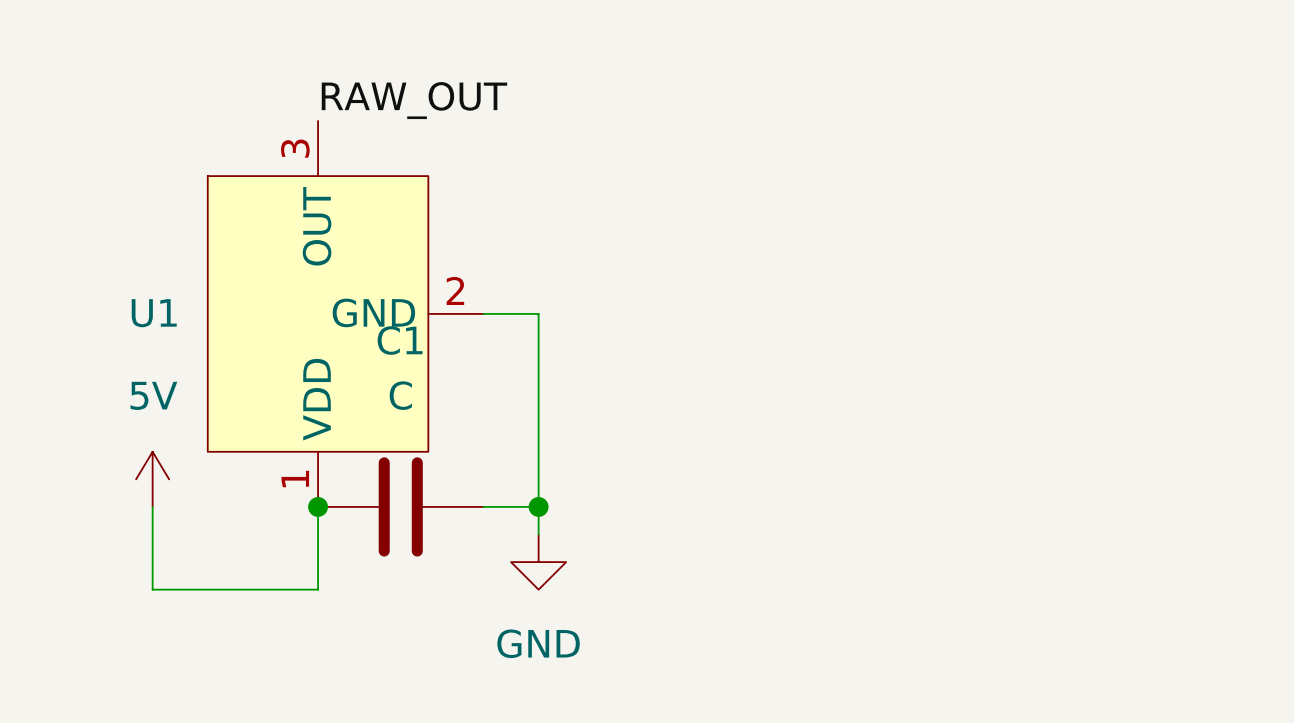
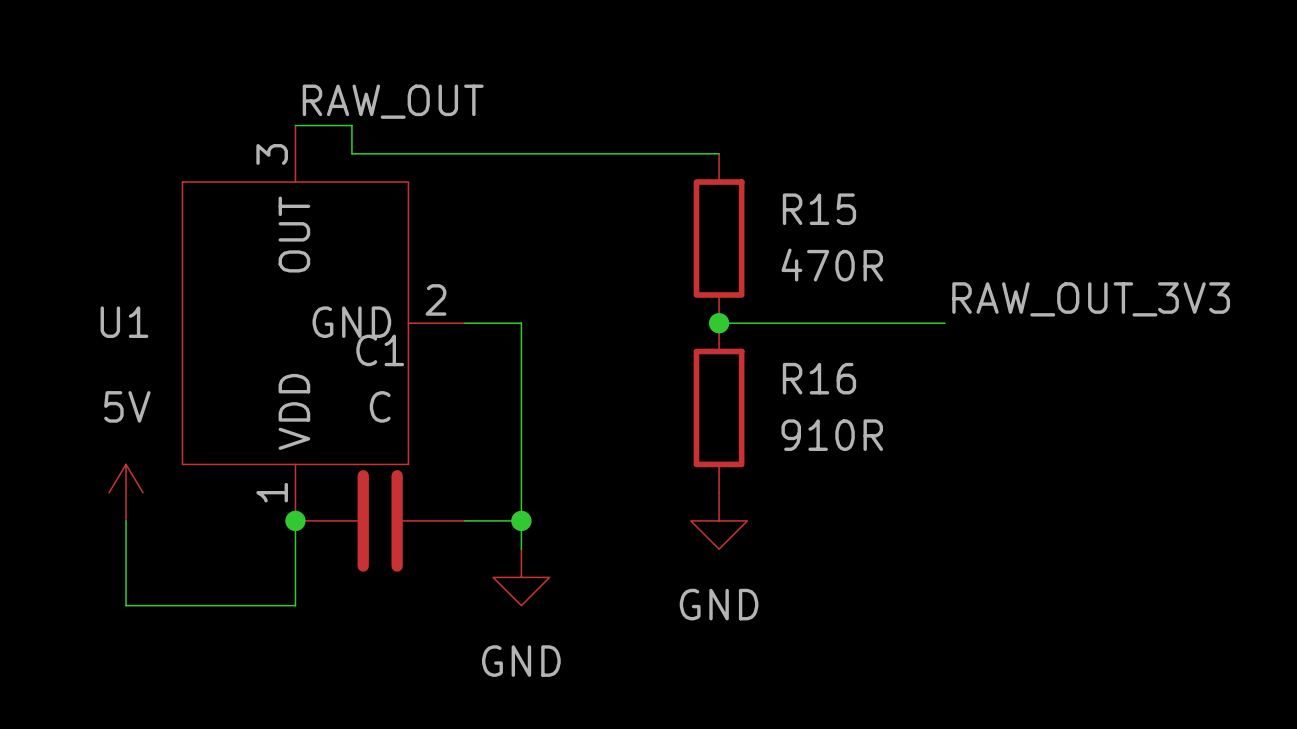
wire: none -> (295, 125) (351, 125) (351, 153) (719, 153)
R15: none -> 470R (719, 238)
label: none -> RAW_OUT_3V3 (1091, 299)
wire: none -> (719, 323) (945, 323)
junction: none -> (719, 323)
R16: none -> 910R (719, 407)
power symbol: none -> GND (719, 520)

